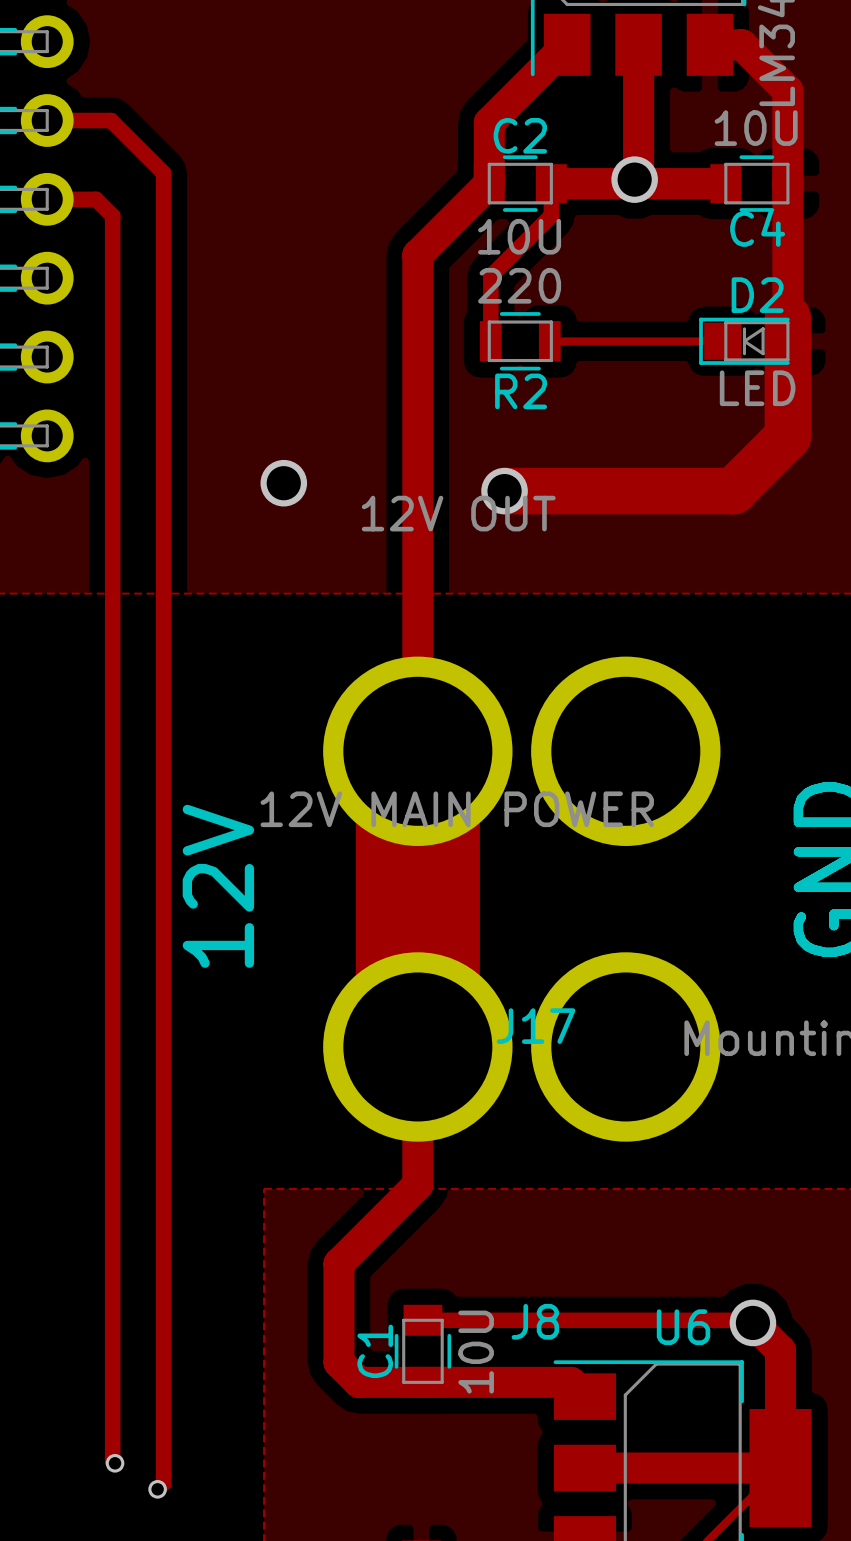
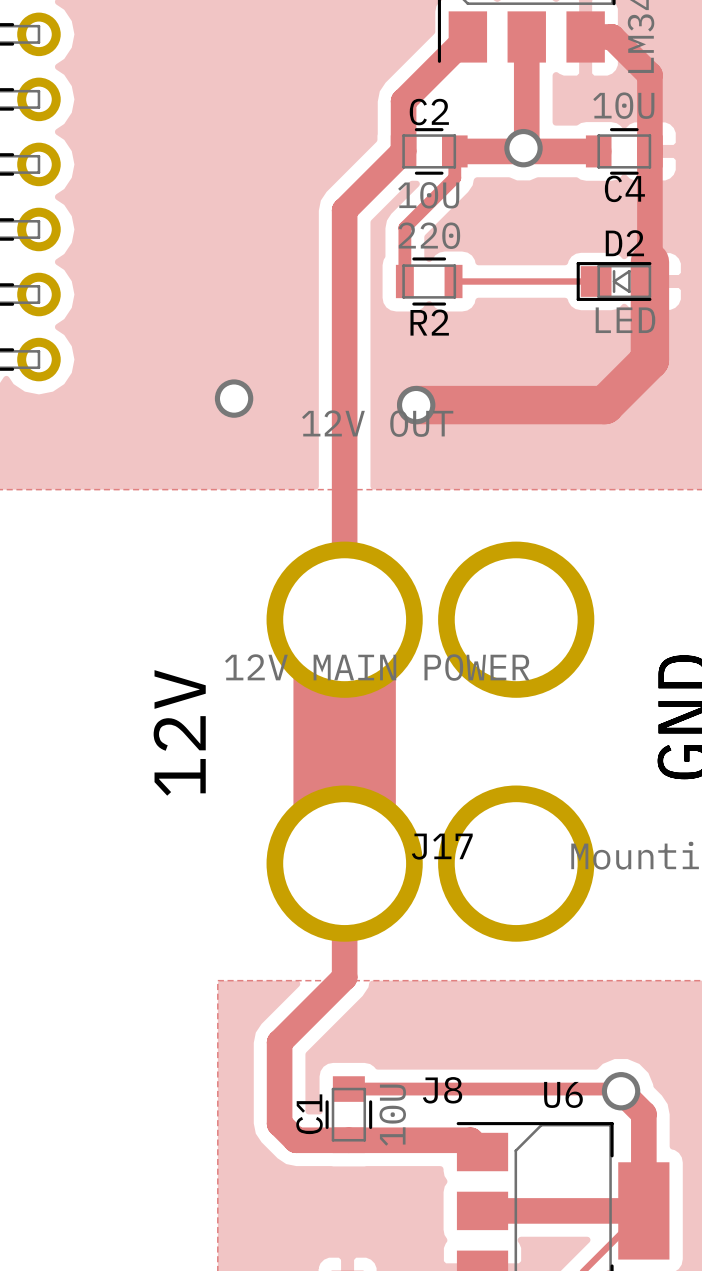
track: (47, 120) (111, 120) (163, 172) (163, 1483) (157, 1489) -> none
track: (47, 199) (96, 199) (112, 215) (112, 1460) (115, 1463) -> none
via: (115, 1463) -> none
via: (157, 1489) -> none

